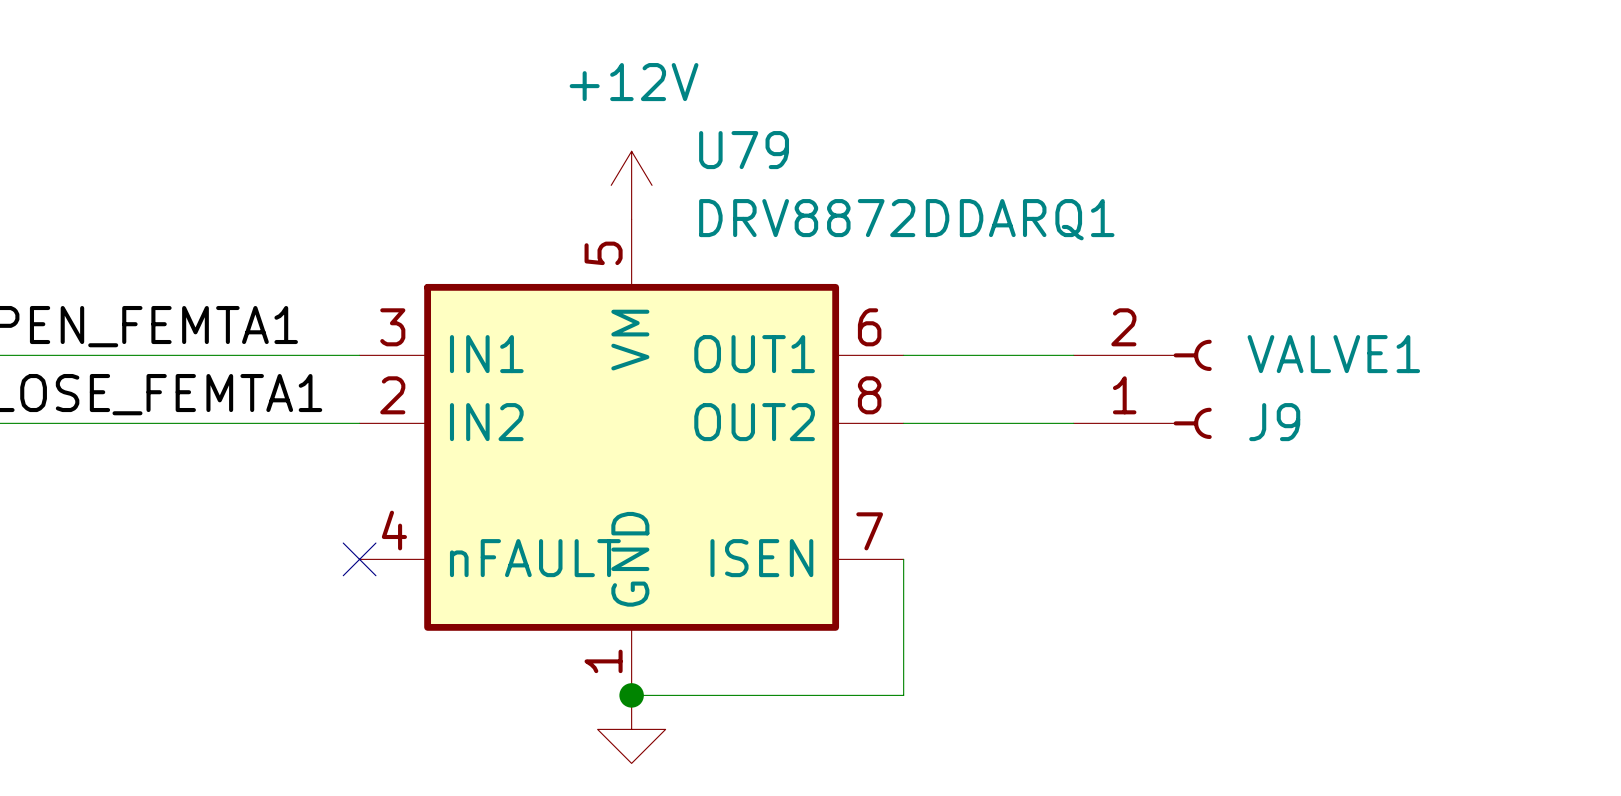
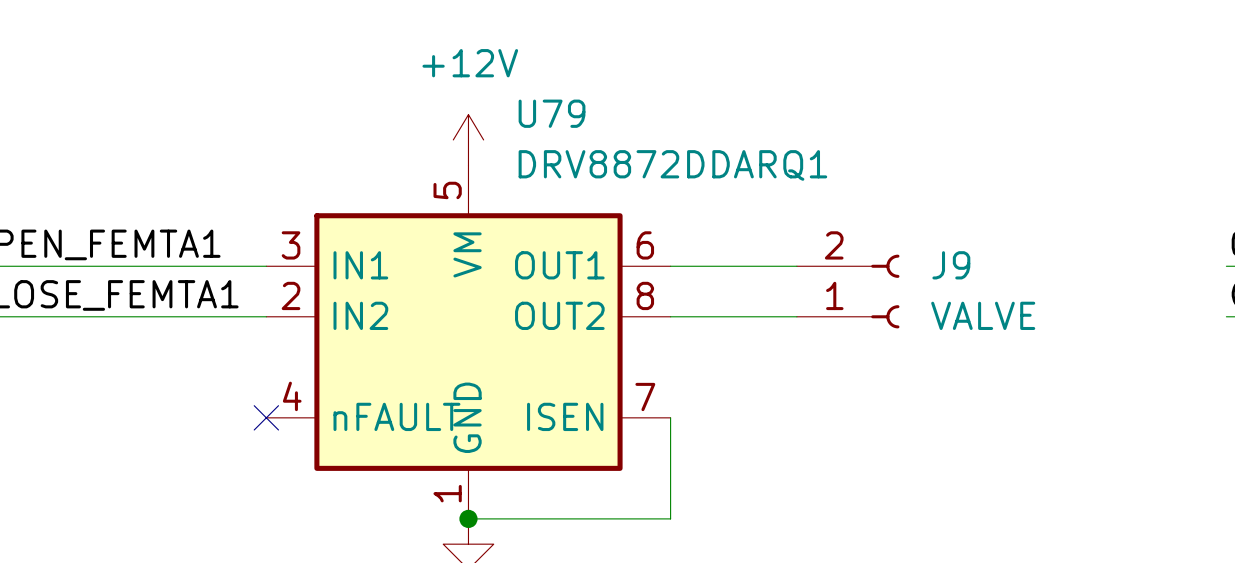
J9 value: VALVE1 (1333, 354) -> VALVE (983, 315)
J9 name position: J9 (1274, 422) -> J9 (951, 265)

